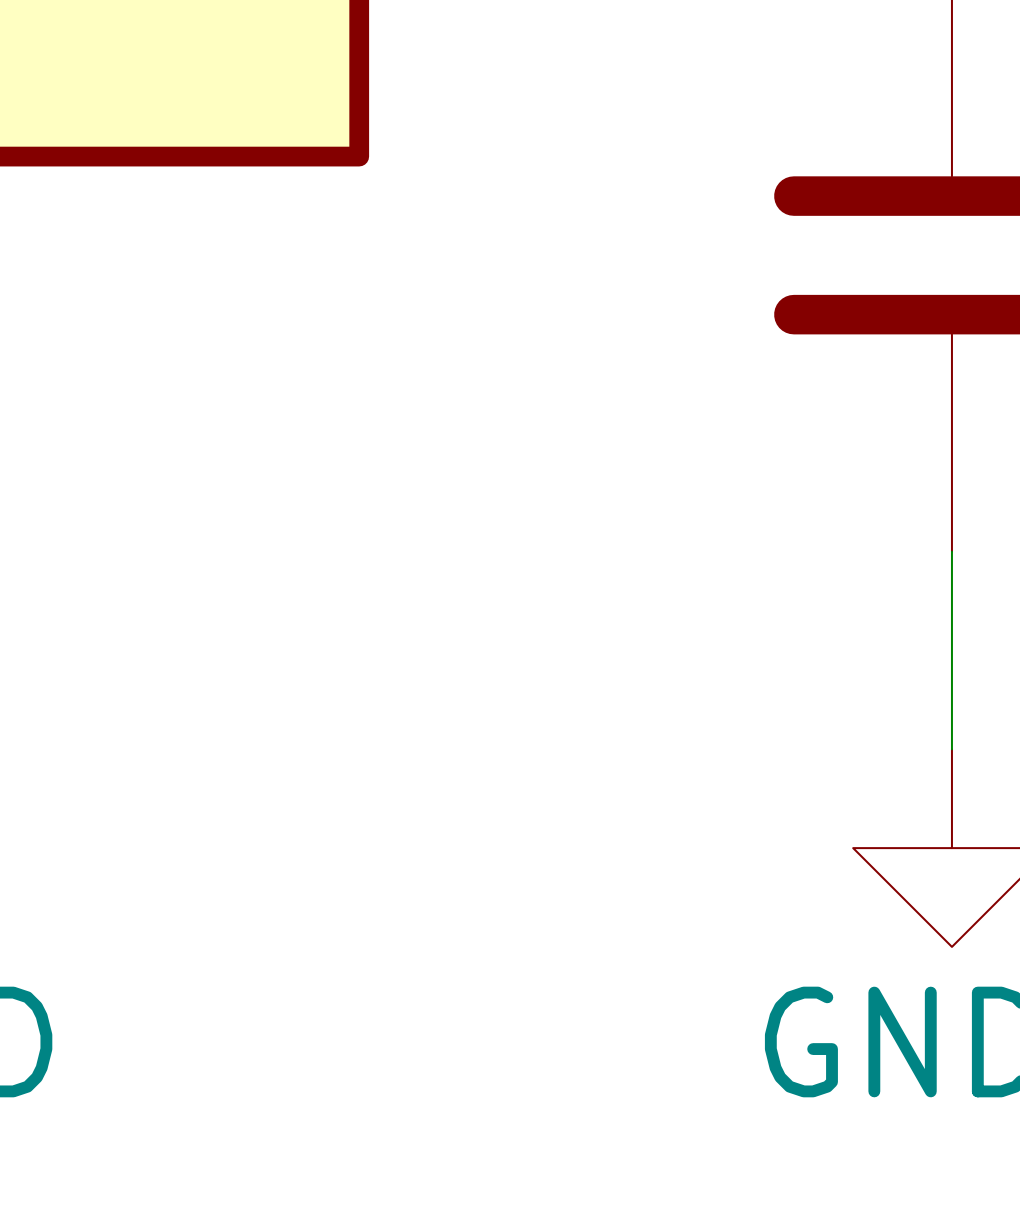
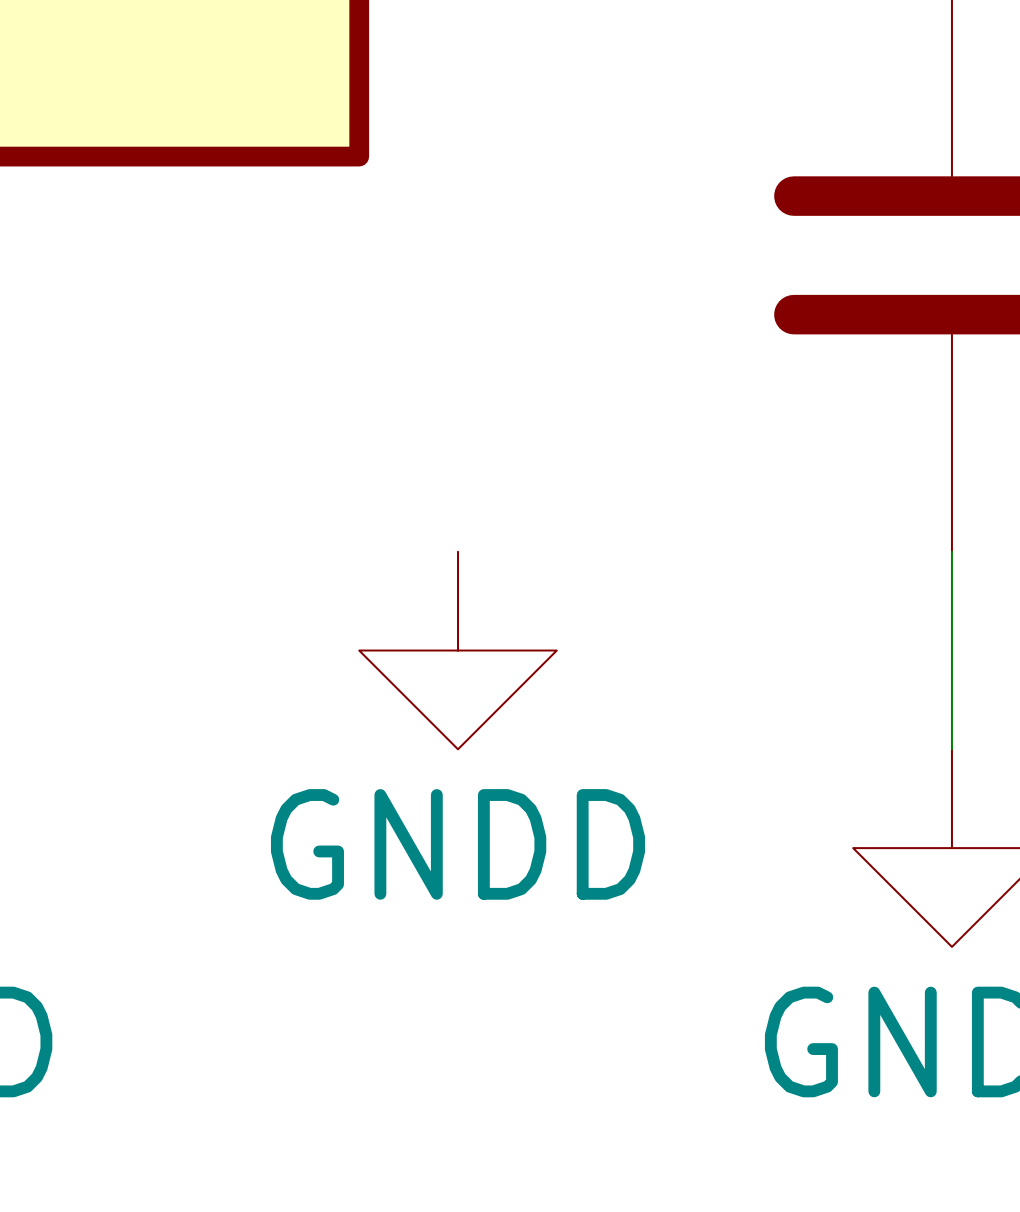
power symbol: none -> GNDD (458, 650)

